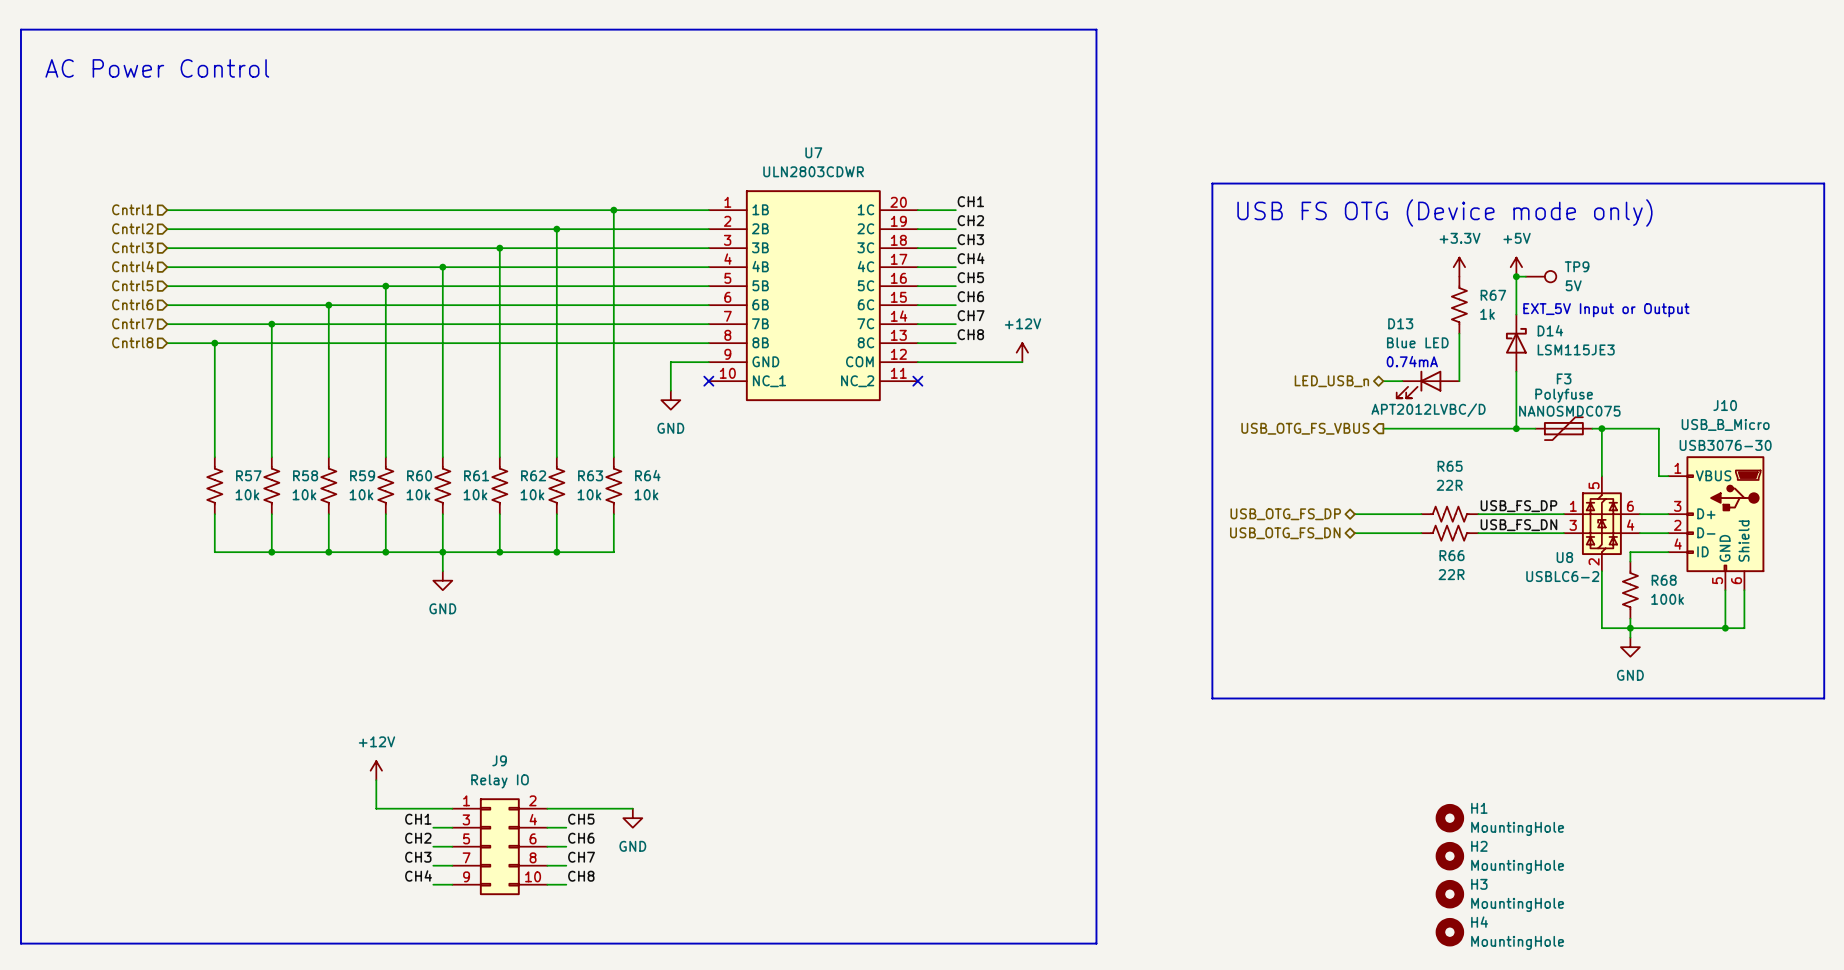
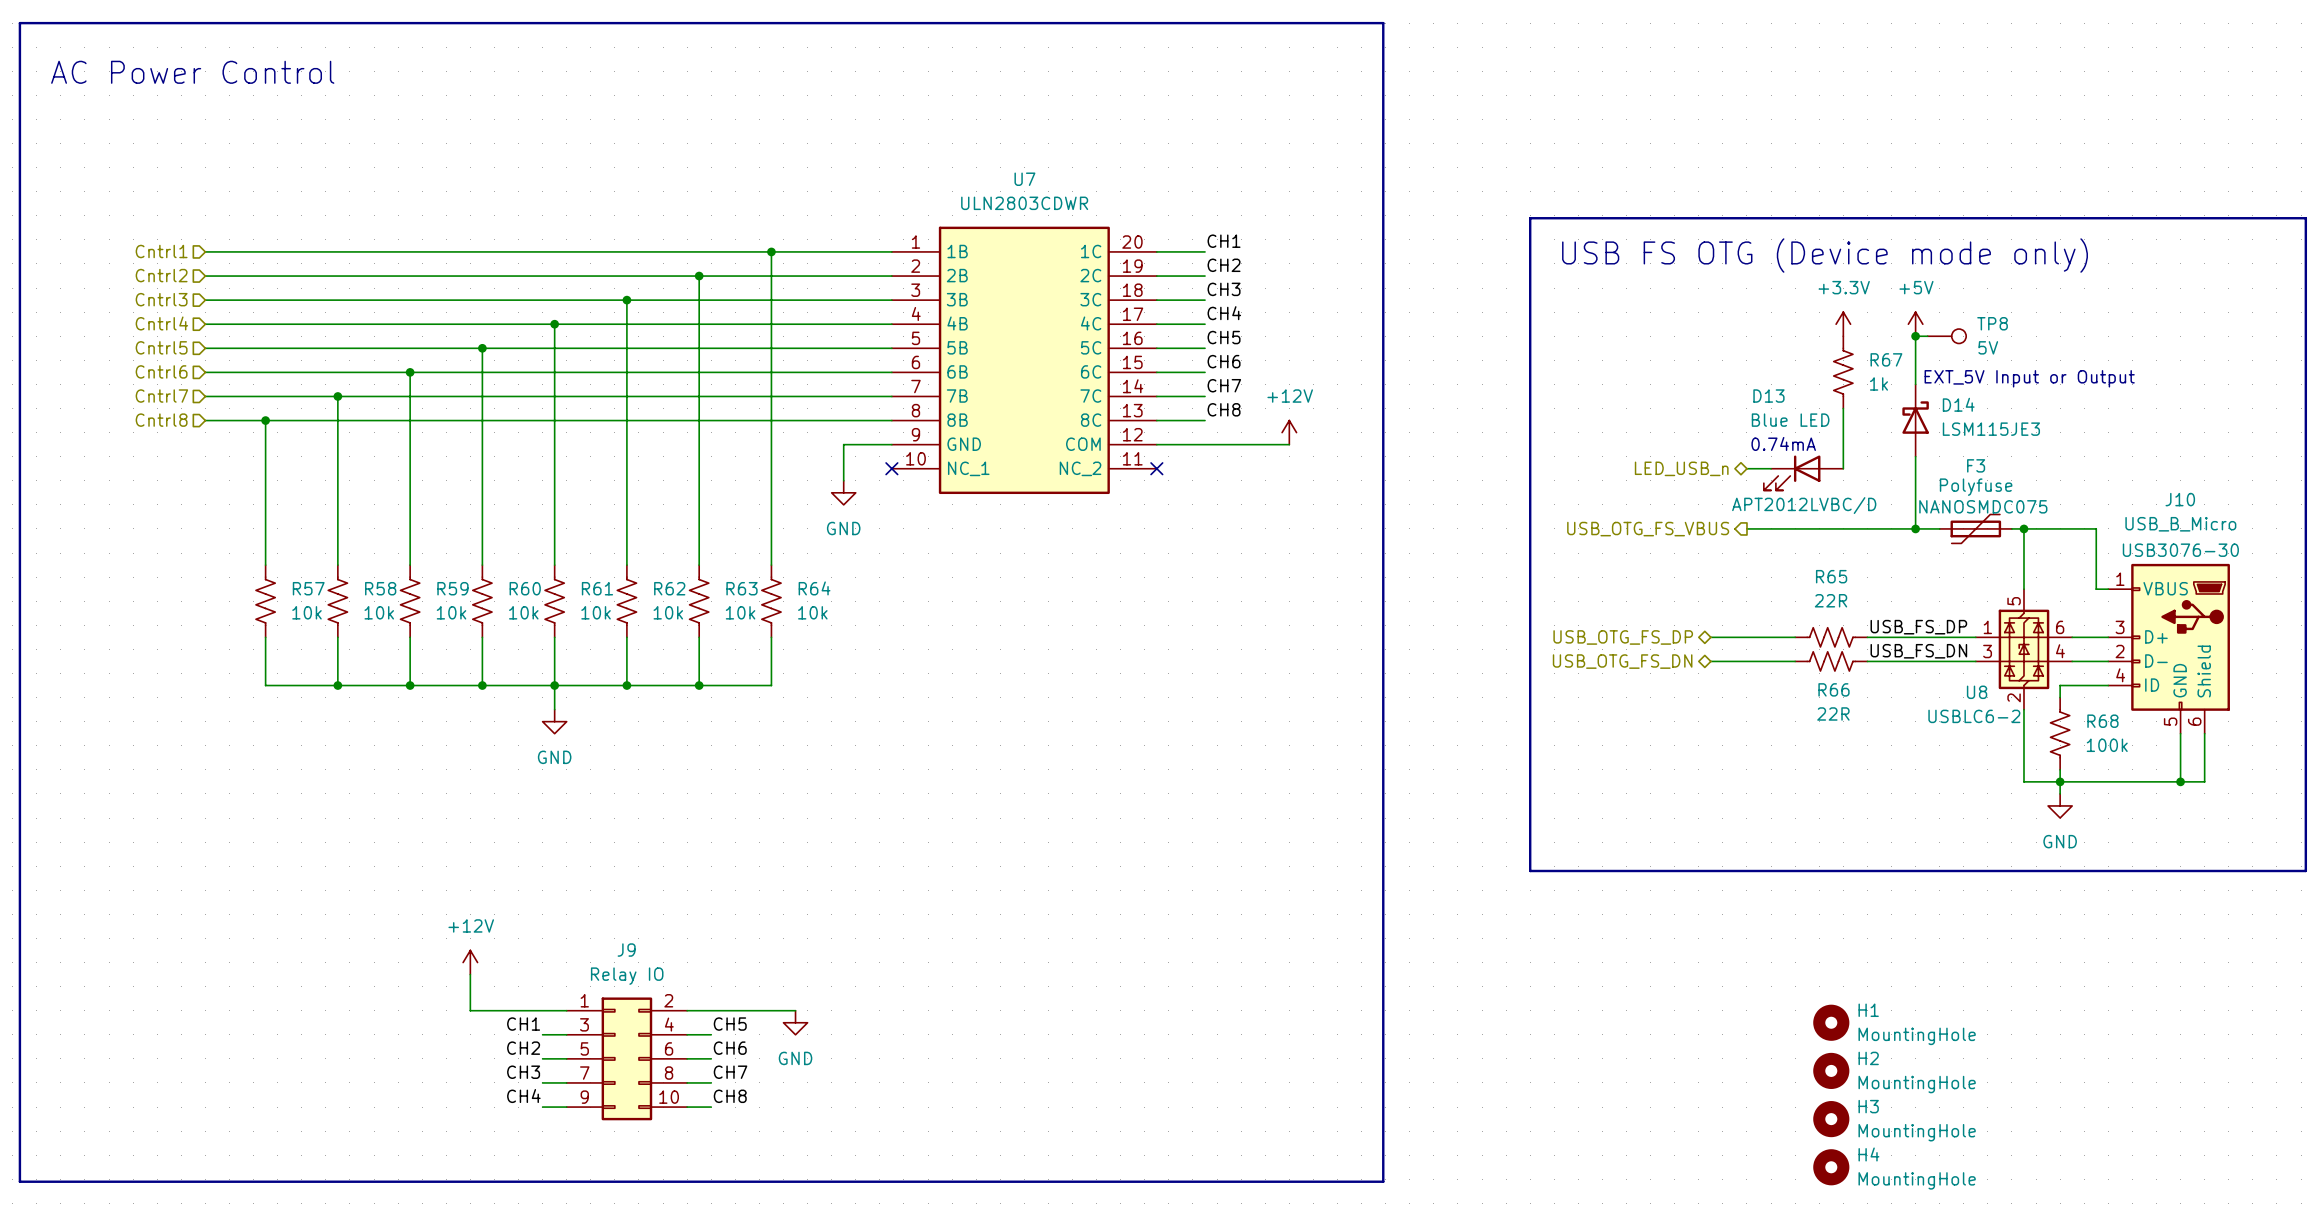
TP9 name: TP9 (1577, 266) -> TP8 (1992, 323)

